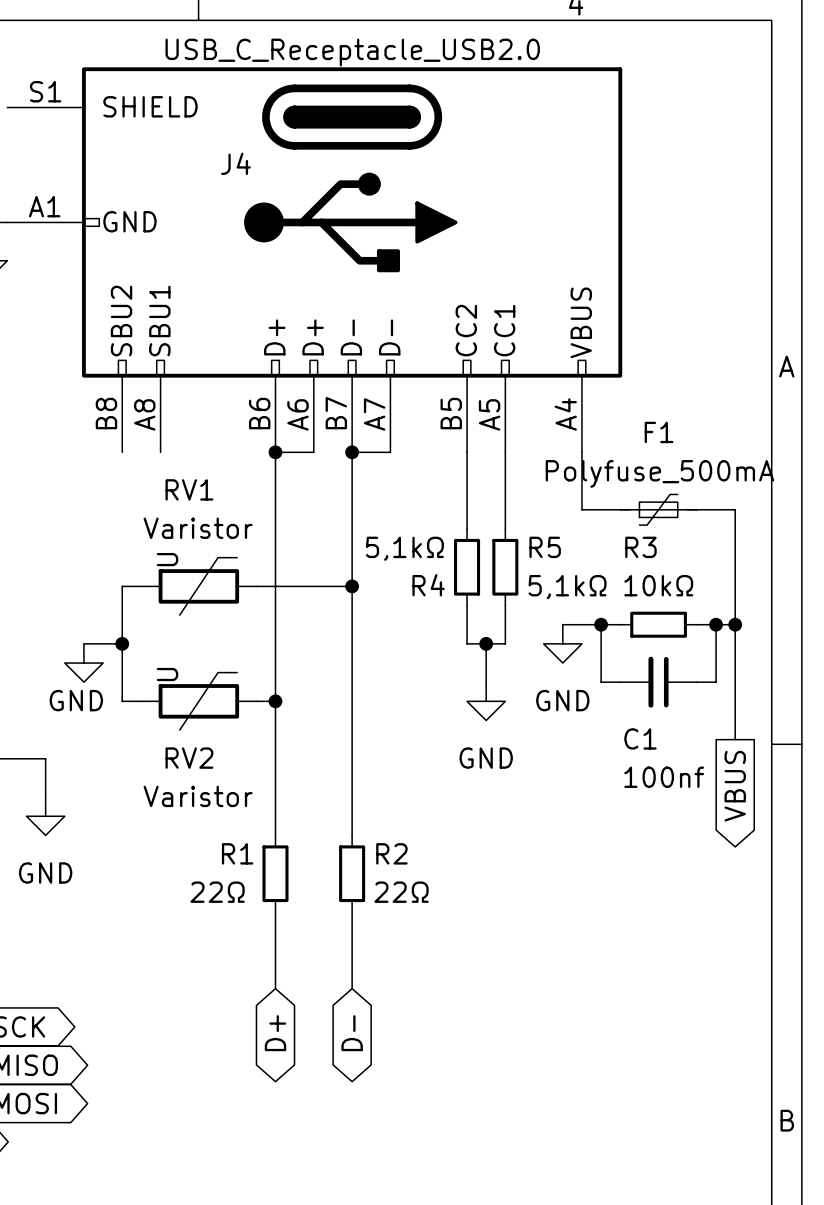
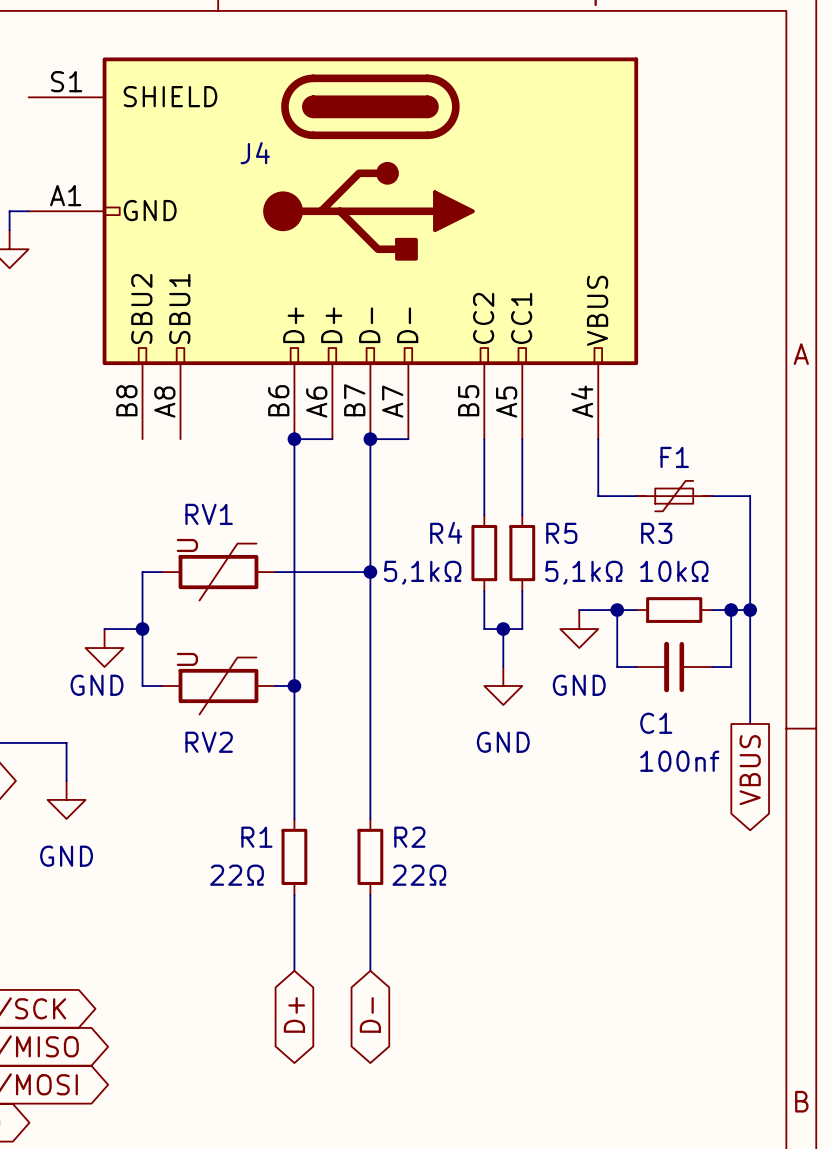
J4 value: USB_C_Receptacle_USB2.0 (352, 52) -> none
F1 name position: F1 (659, 432) -> F1 (674, 457)
F1 value: Polyfuse_500mA (659, 473) -> none
RV1 name position: RV1 (189, 489) -> RV1 (209, 514)
RV1 value: Varistor (198, 528) -> none
R4 value position: 5,1kΩ (404, 548) -> 5,1kΩ (422, 572)
R4 name position: R4 (428, 585) -> R4 (446, 532)
RV2 value: Varistor (198, 796) -> none

